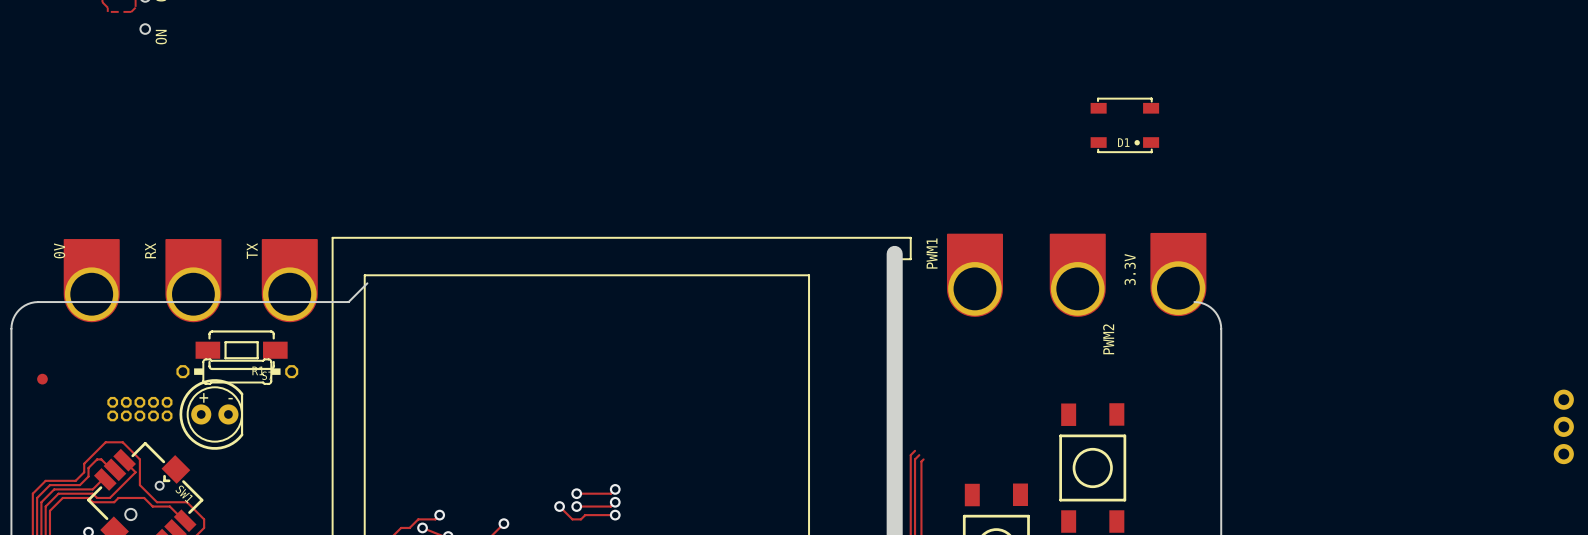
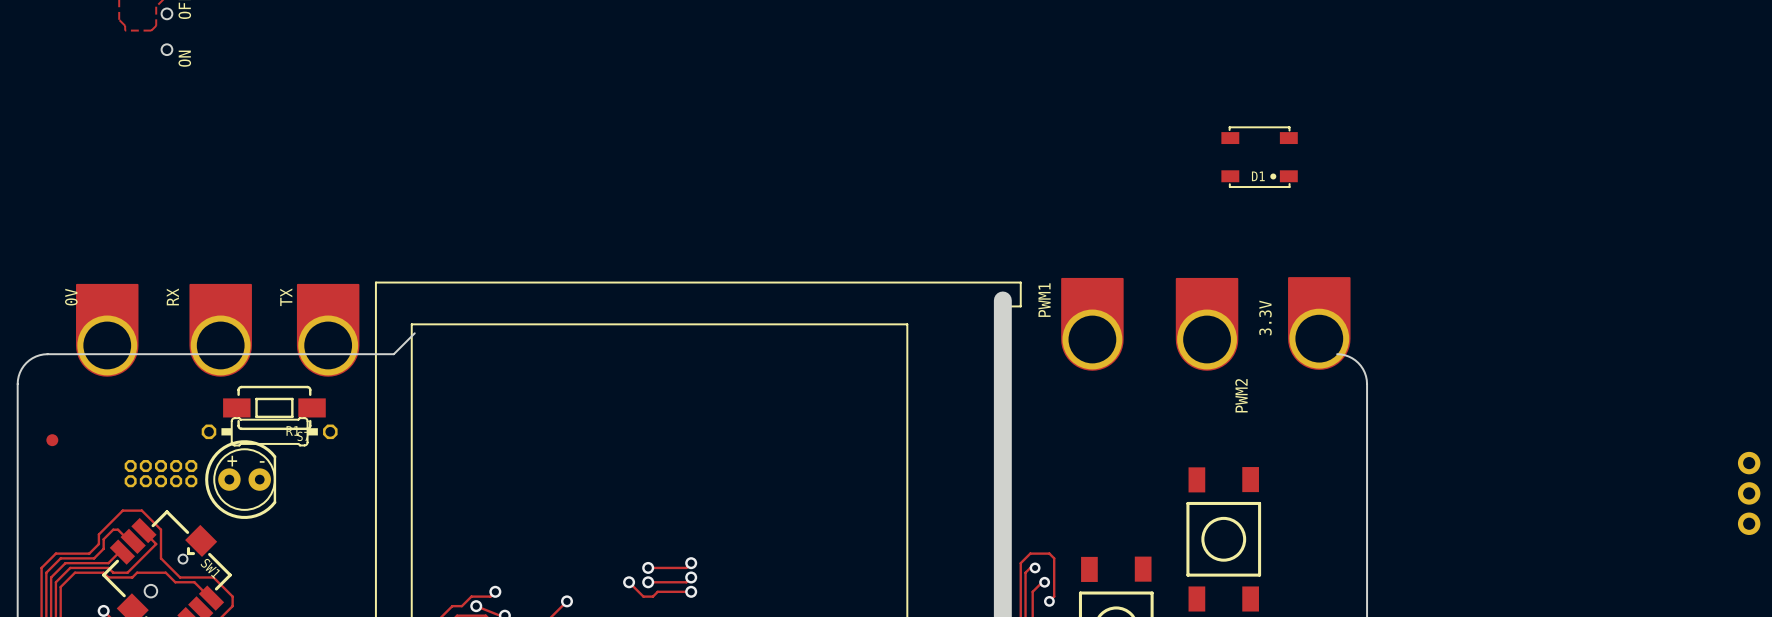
track: (915, 450) (910, 455) (910, 489) -> (1049, 601) (1054, 596) (1054, 558) (1049, 553) (1030, 553) (1020, 563)
track: (919, 455) (915, 459) (915, 497) -> (1035, 567) (1030, 567) (1025, 572)
track: (923, 459) (921, 461) (921, 515) -> (1044, 582) (1032, 591)
via: none -> (1035, 567)
via: none -> (1044, 582)
via: none -> (1049, 601)

